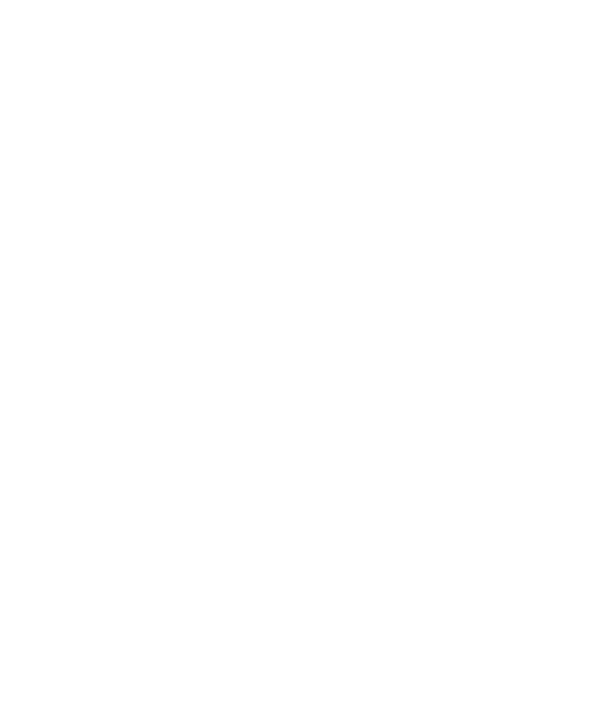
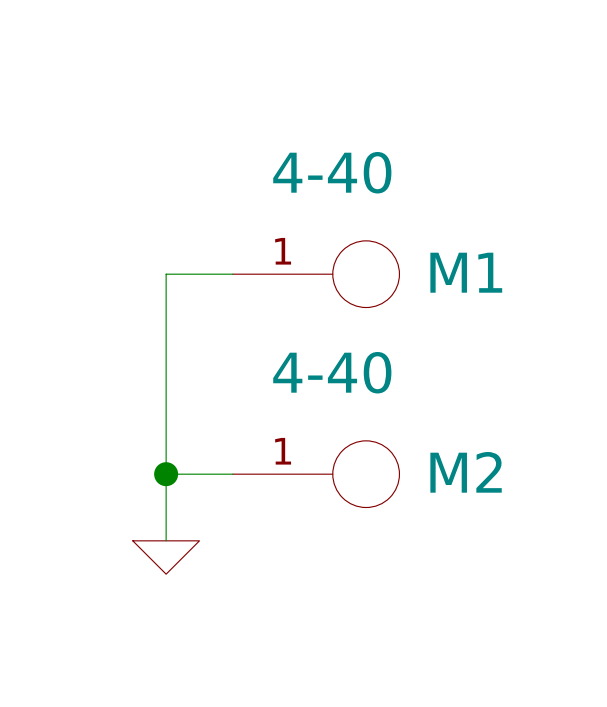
wire: none -> (232, 274) (166, 274) (166, 540)
M1: none -> 4-40 (316, 274)
wire: none -> (166, 474) (232, 474)
junction: none -> (166, 474)
M2: none -> 4-40 (316, 474)
power symbol: none -> (166, 557)

